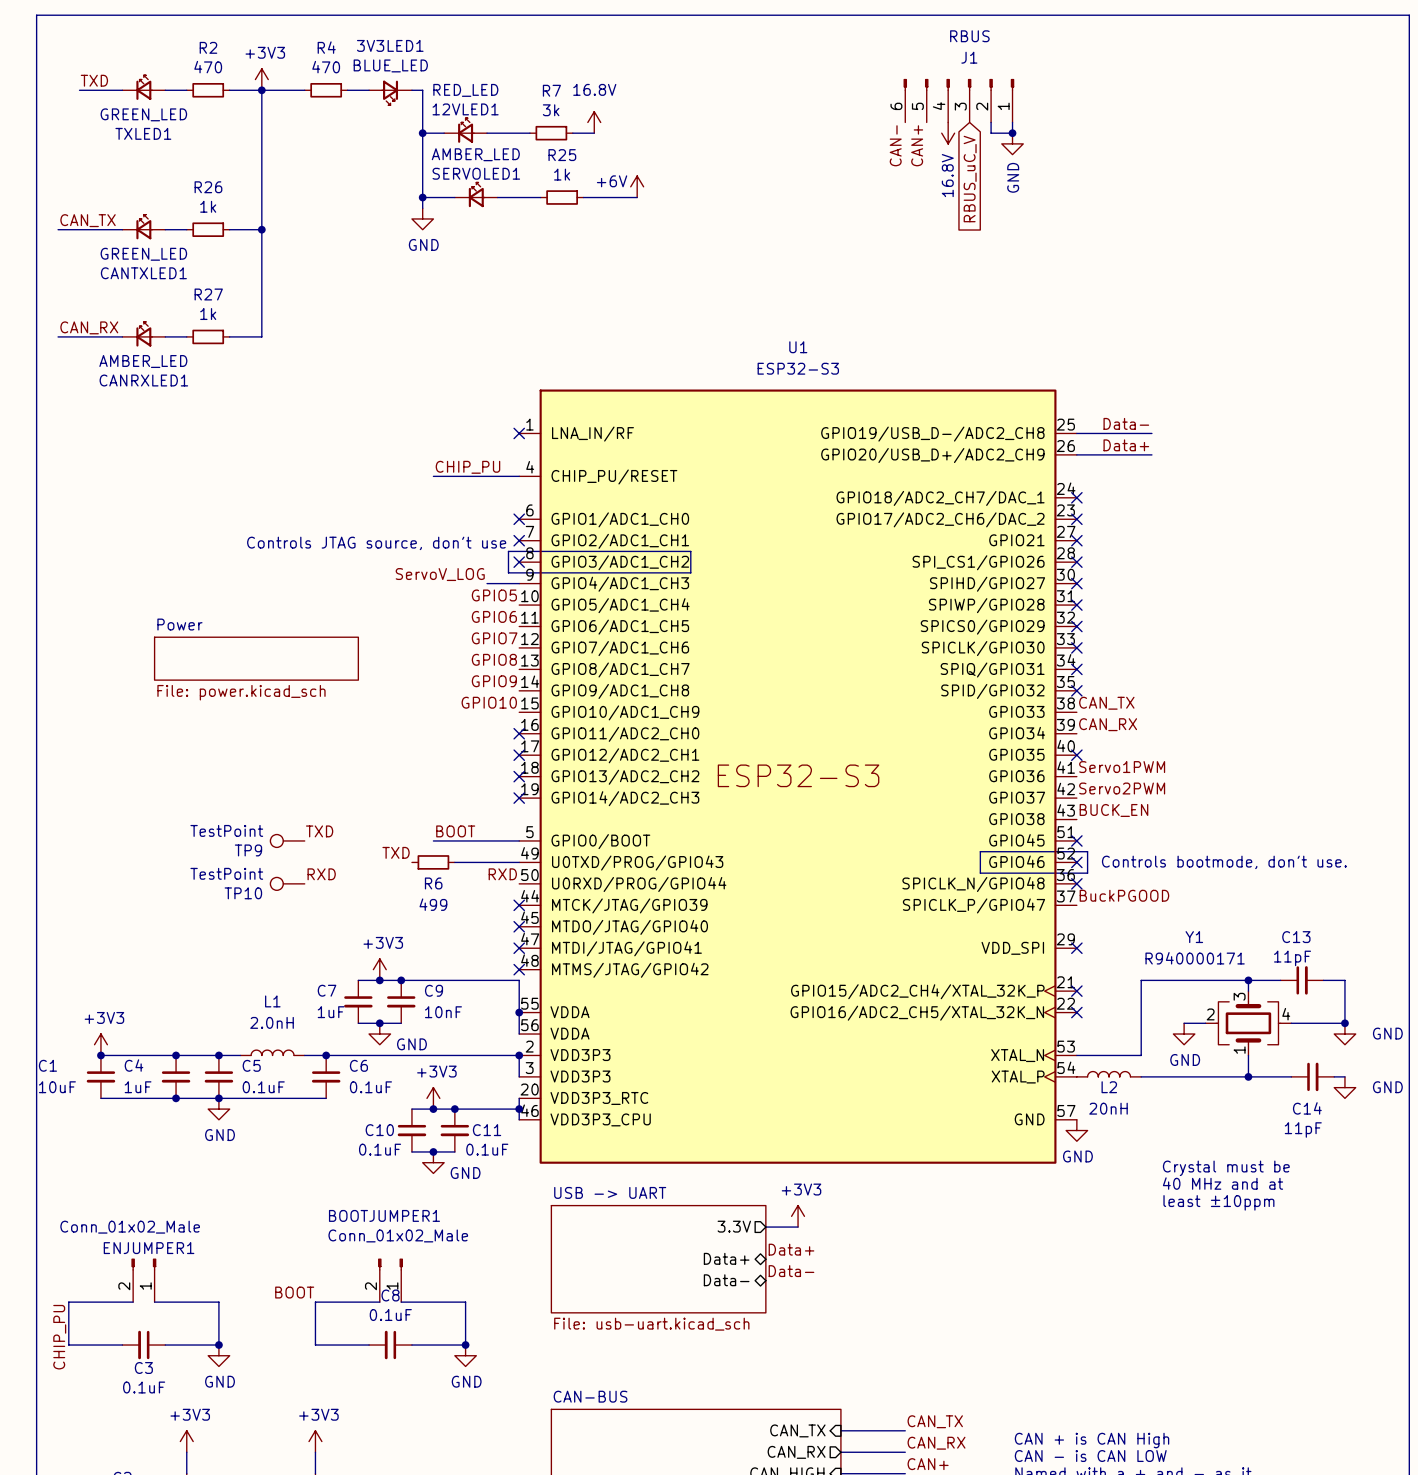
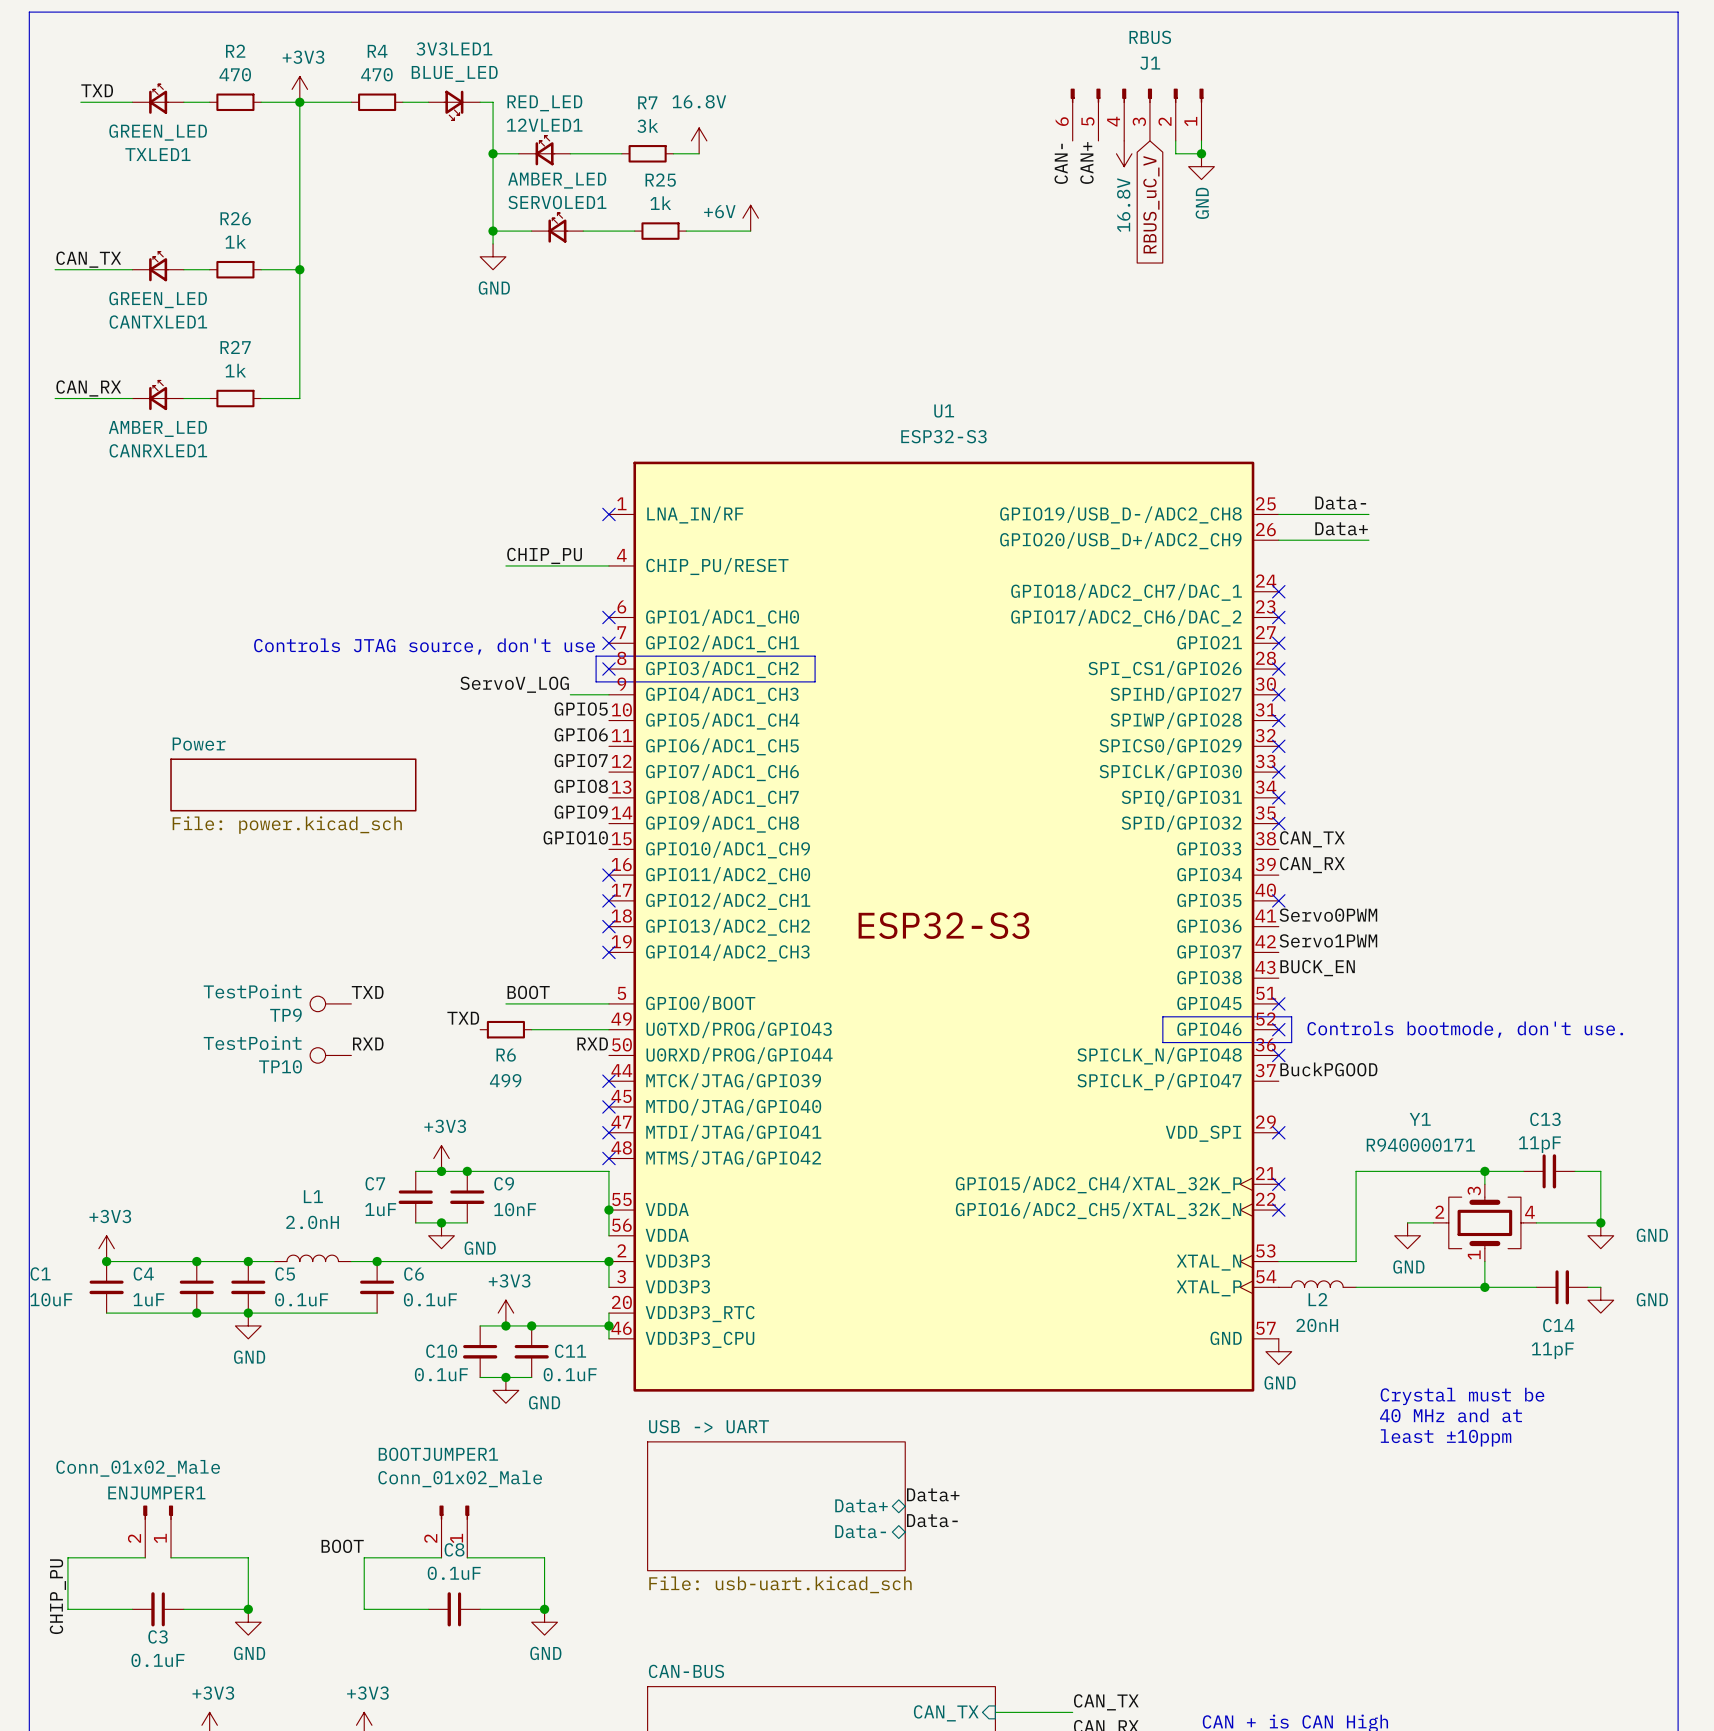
label: Servo1PWM (1122, 767) -> Servo0PWM (1328, 915)
label: Servo2PWM (1122, 788) -> Servo1PWM (1328, 940)
power symbol: +3V3 (798, 1216) -> none
sheet pin: 3.3V (734, 1226) -> none
wire: (765, 1227) (798, 1227) -> none

